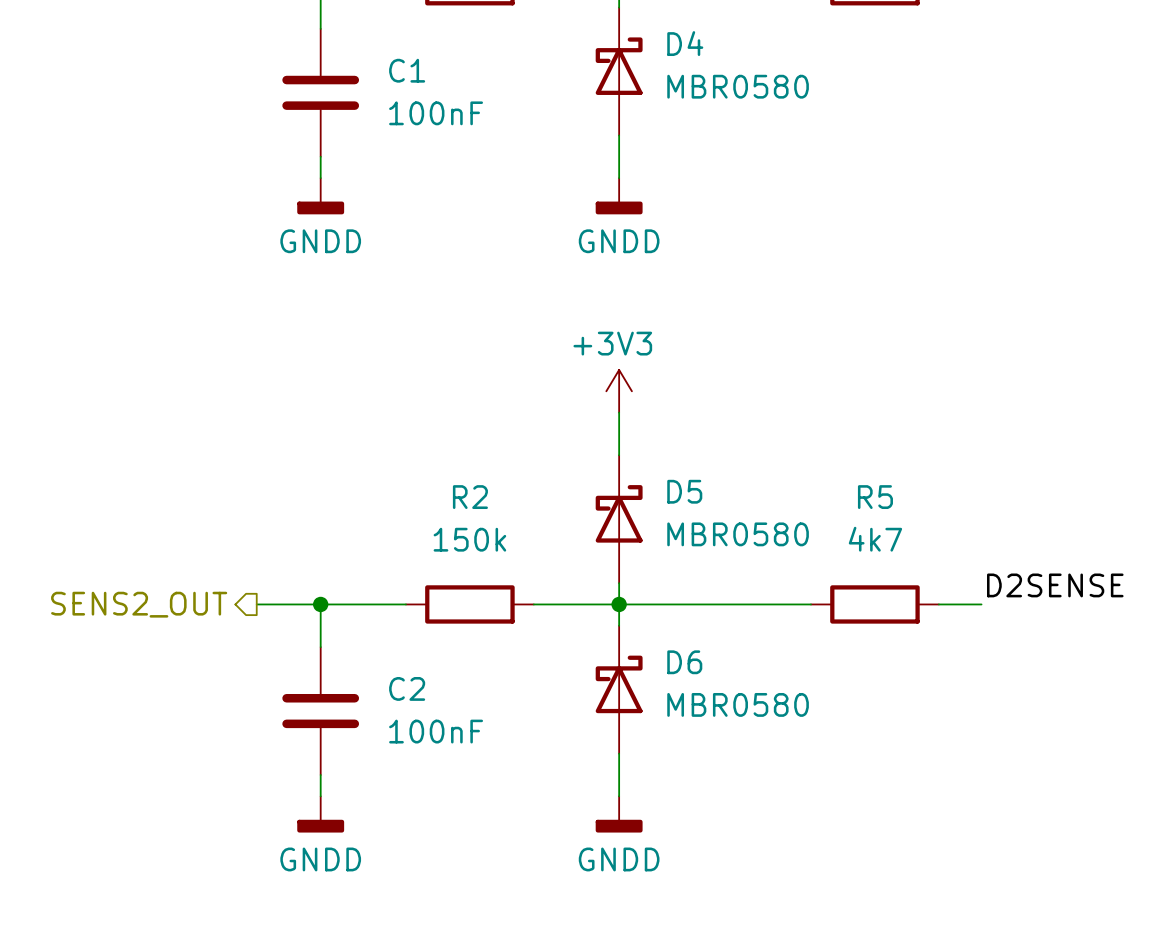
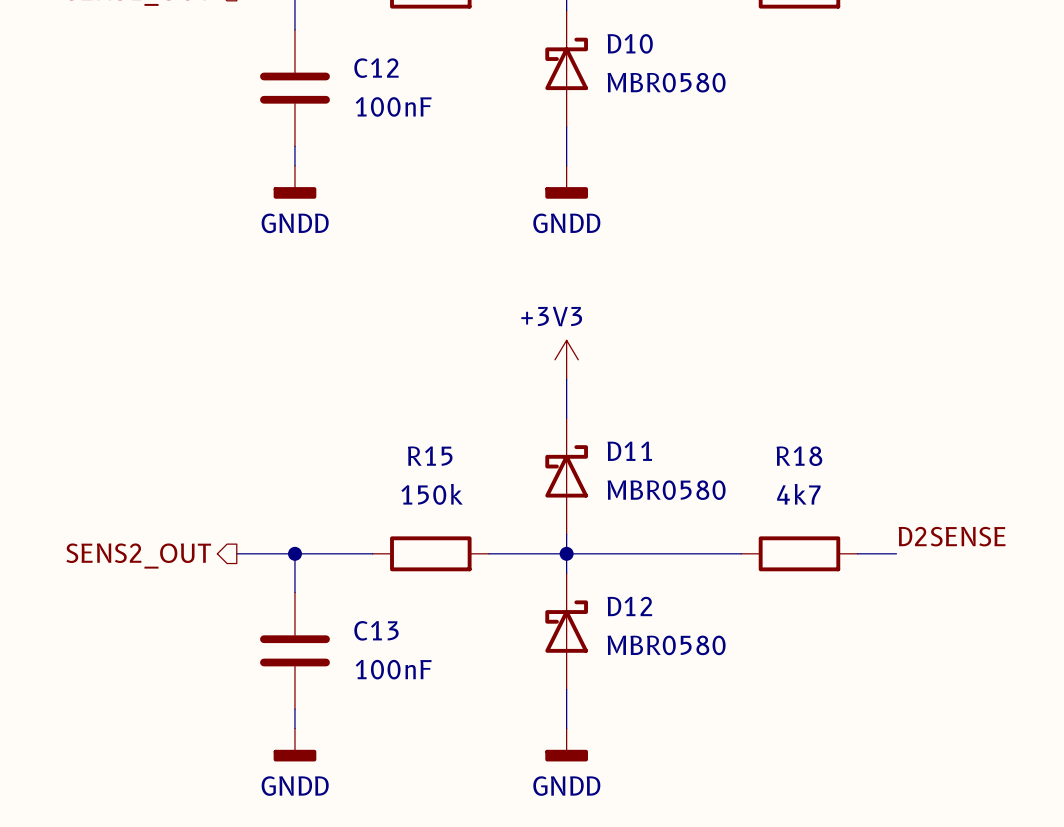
D4 name: D4 (685, 43) -> D10 (630, 43)
C1 name: C1 (407, 70) -> C12 (376, 68)
D5 name: D5 (684, 491) -> D11 (629, 451)
R2 name: R2 (470, 497) -> R15 (430, 456)
R5 name: R5 (875, 497) -> R18 (799, 456)
D6 name: D6 (684, 662) -> D12 (629, 606)
C2 name: C2 (407, 688) -> C13 (376, 630)

